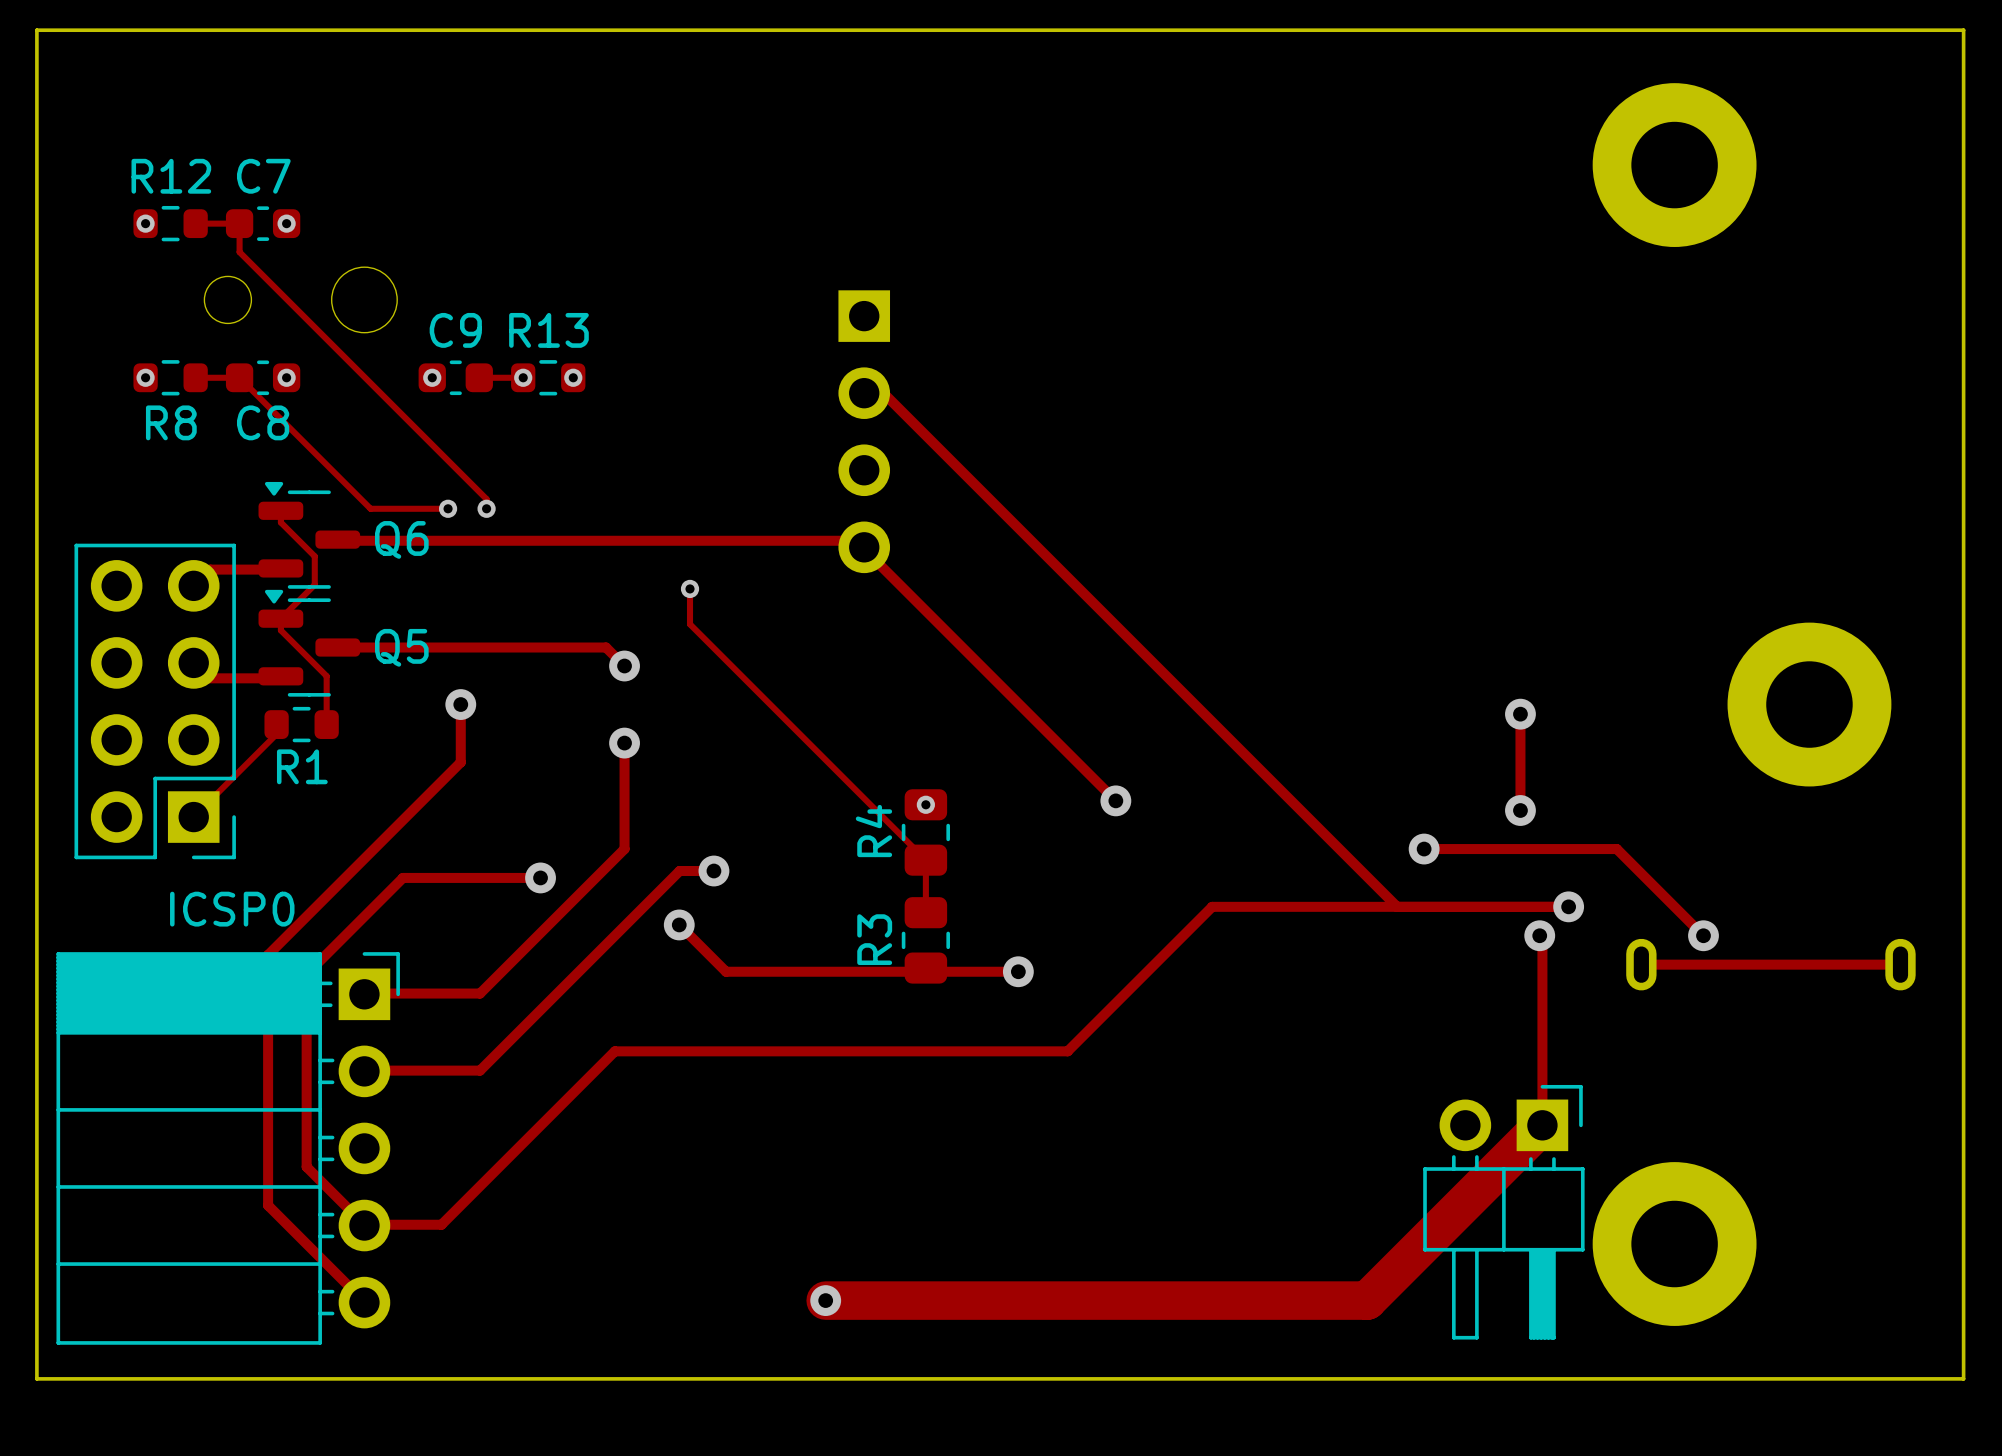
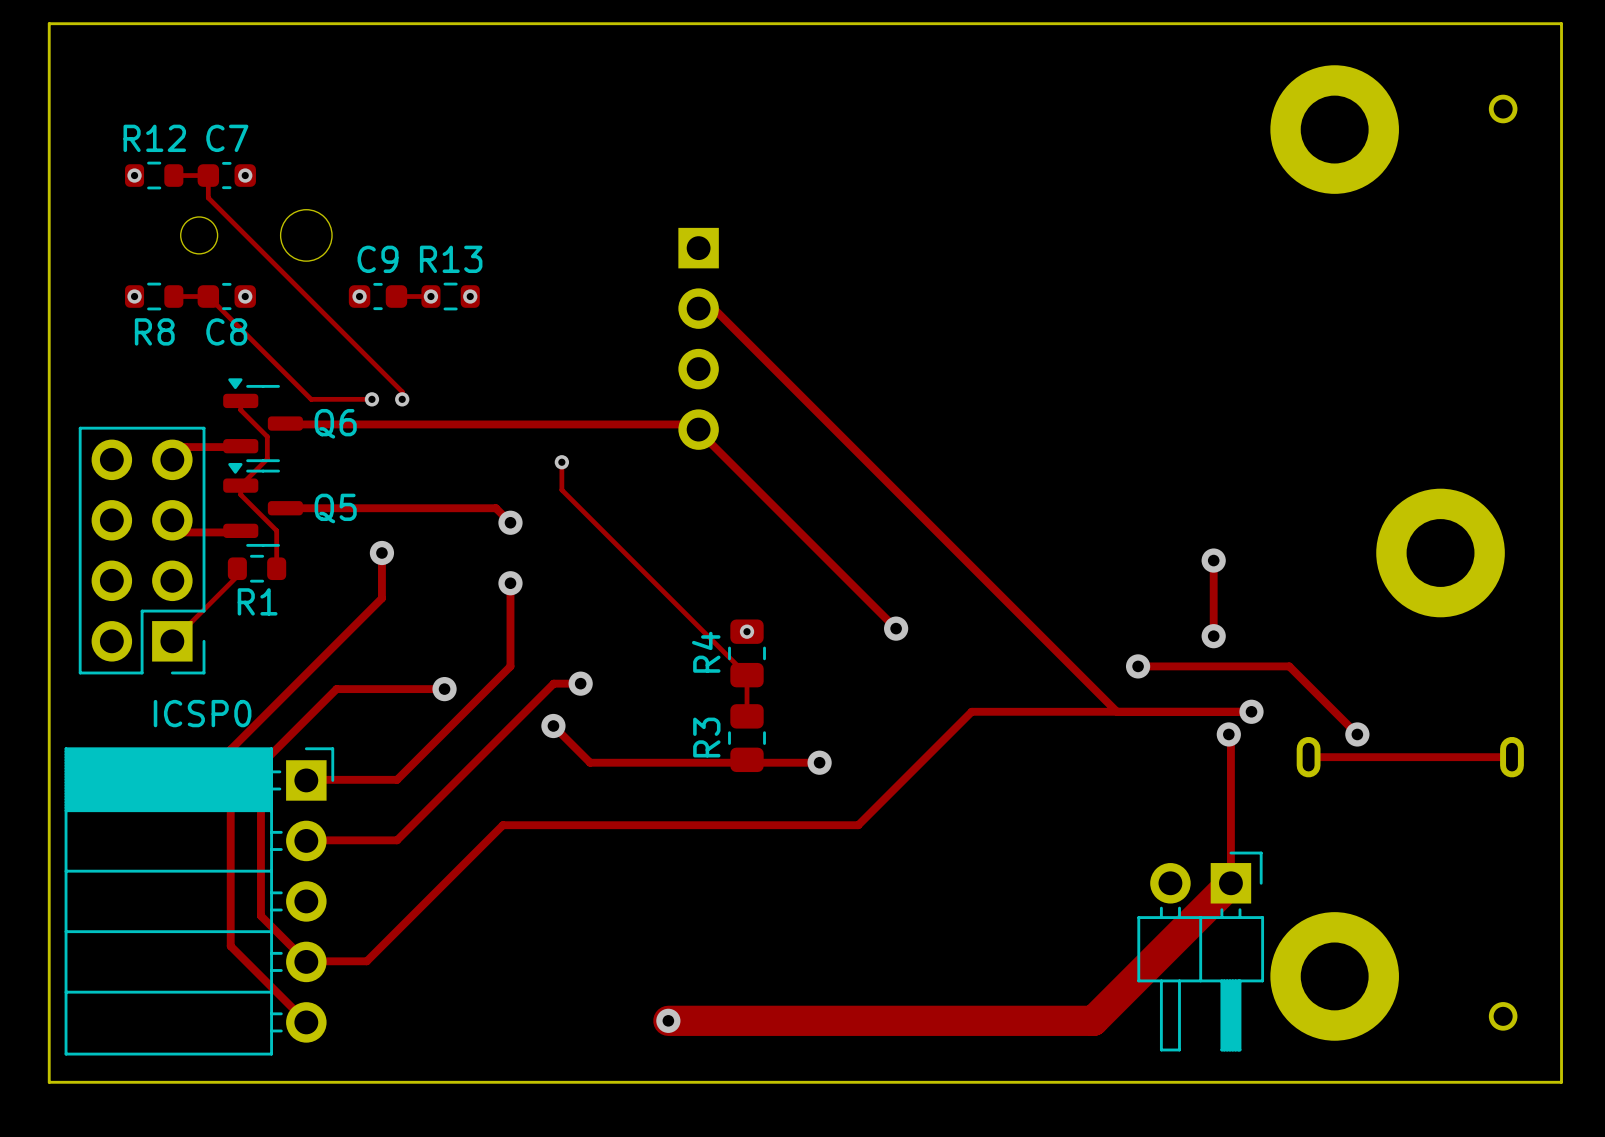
round board edge: none -> [1488, 94, 1518, 124]
round board edge: none -> [1488, 1002, 1518, 1031]

